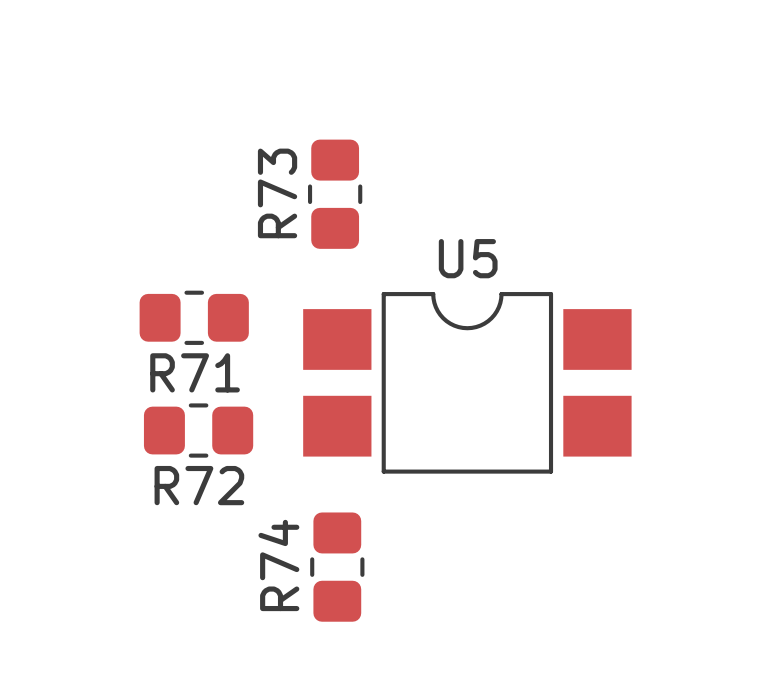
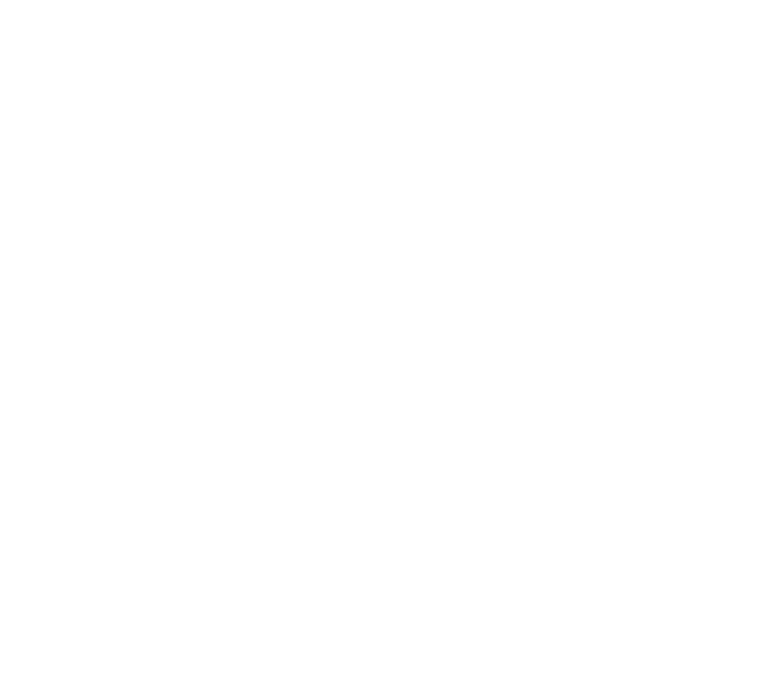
R73: (335, 194) -> none
R71: (194, 317) -> none
U5: (467, 382) -> none
R72: (198, 430) -> none
R74: (337, 567) -> none

